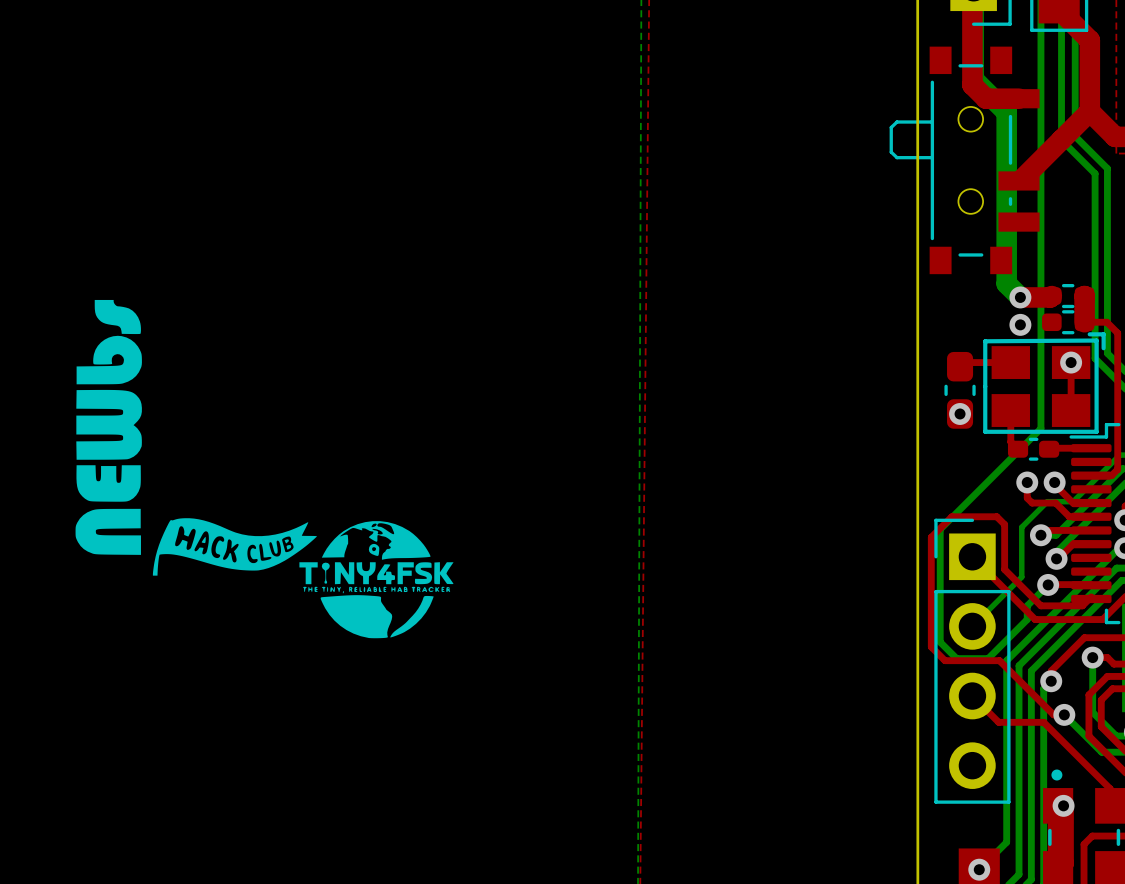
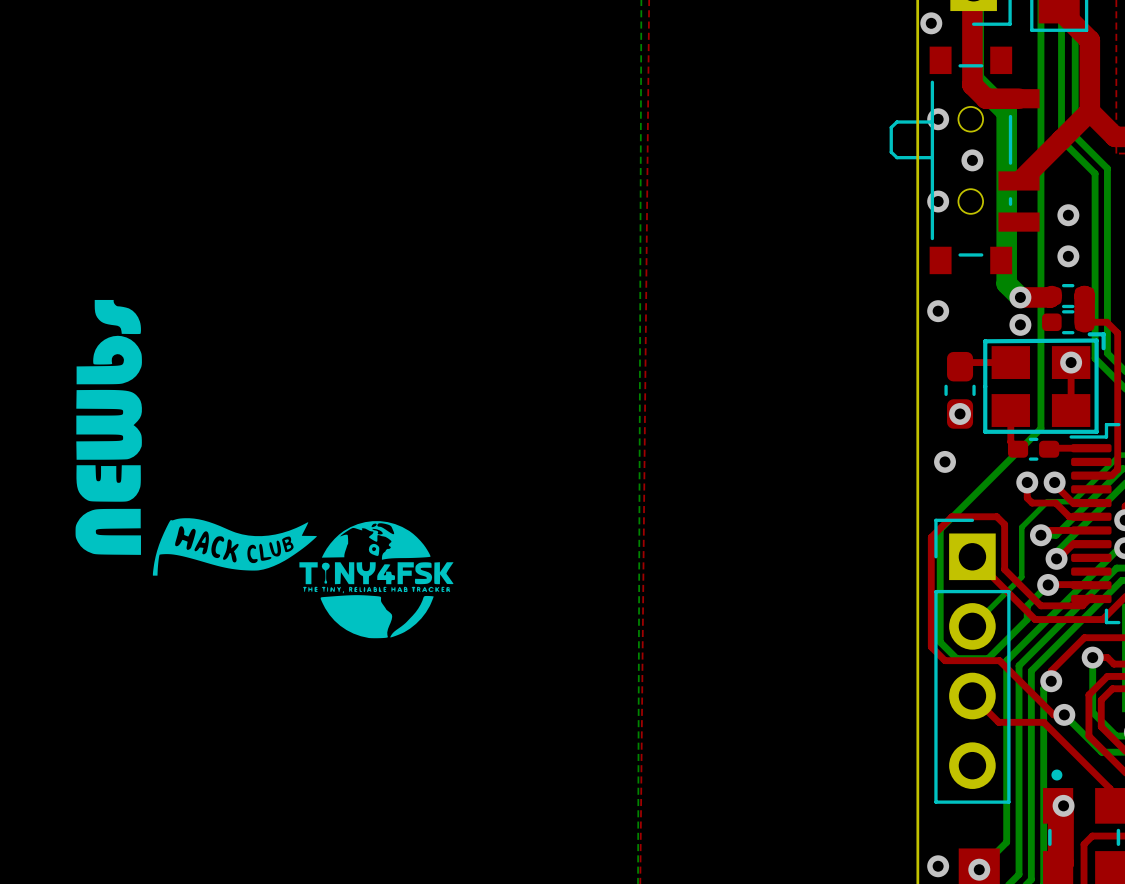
via: none -> (931, 23)
via: none -> (938, 119)
via: none -> (972, 160)
via: none -> (938, 201)
via: none -> (1068, 215)
via: none -> (1068, 256)
via: none -> (938, 311)
via: none -> (945, 461)
via: none -> (938, 866)

